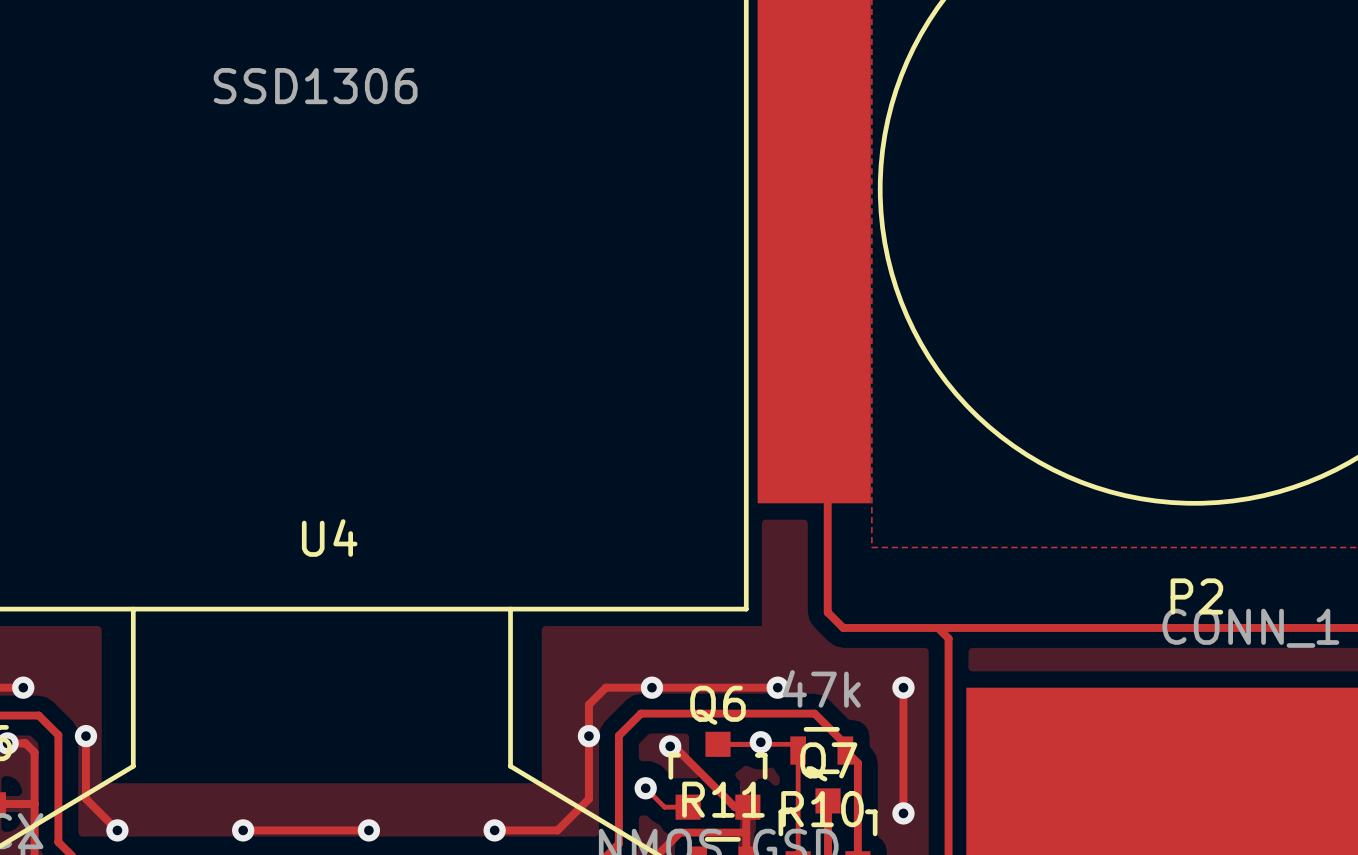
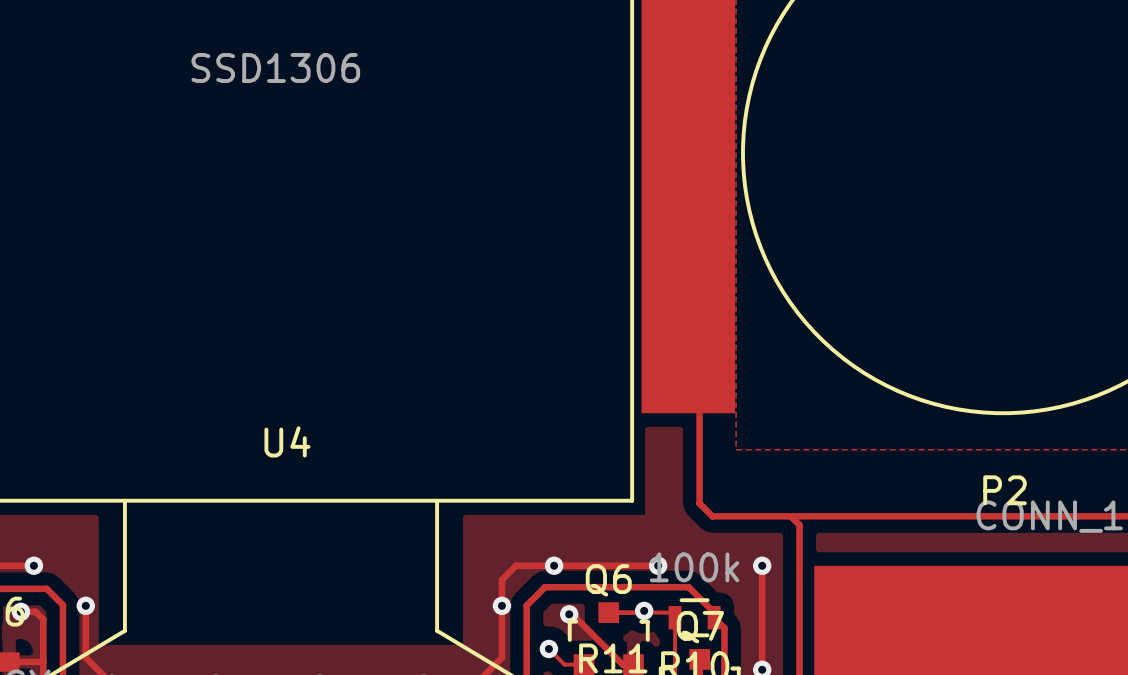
R10 value: 47k (821, 688) -> 100k (694, 567)

